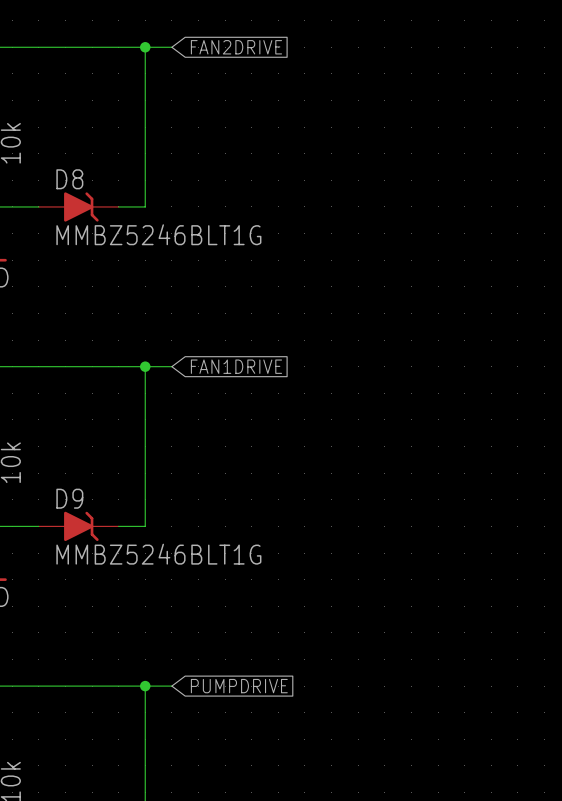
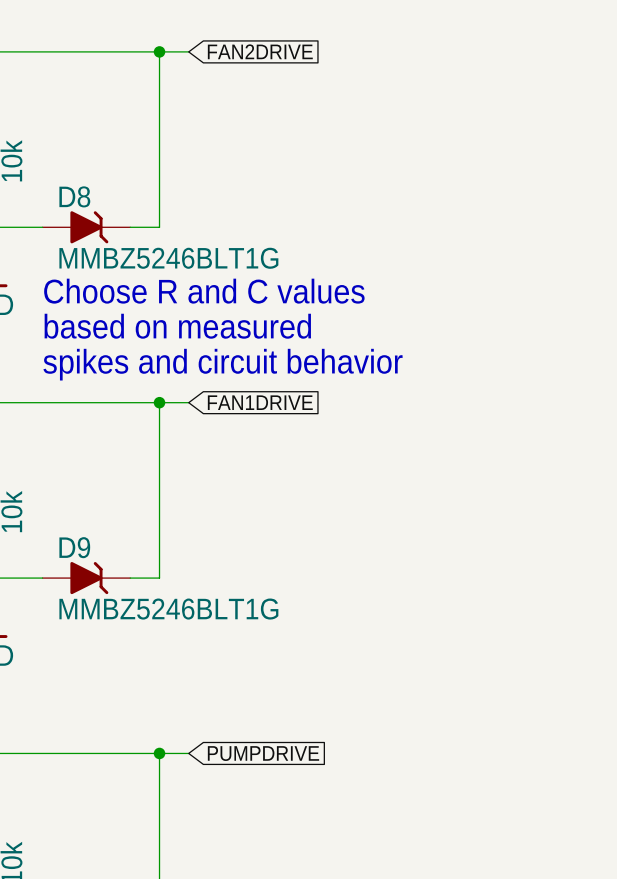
text: none -> Choose R and C values (204, 291)
text: none -> based on measured (177, 326)
text: none -> spikes and circuit behavior (223, 364)

